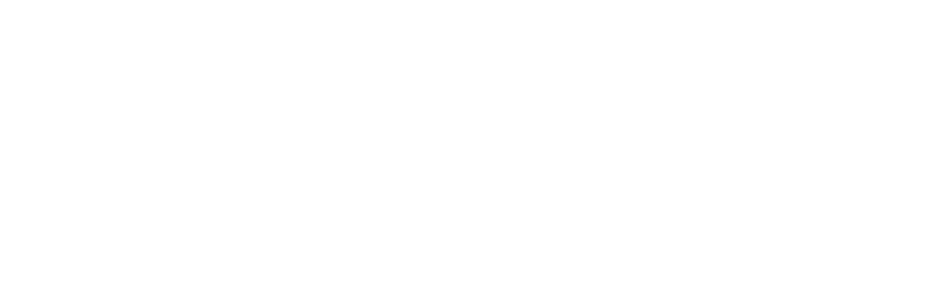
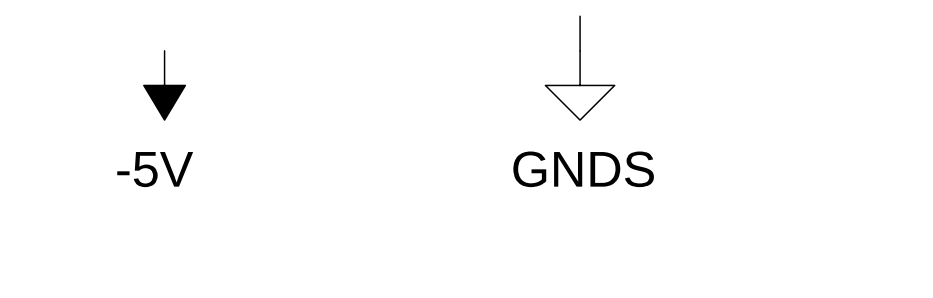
wire: none -> (580, 16) (580, 50)
power symbol: none -> -5V (164, 85)
power symbol: none -> GNDS (580, 85)

